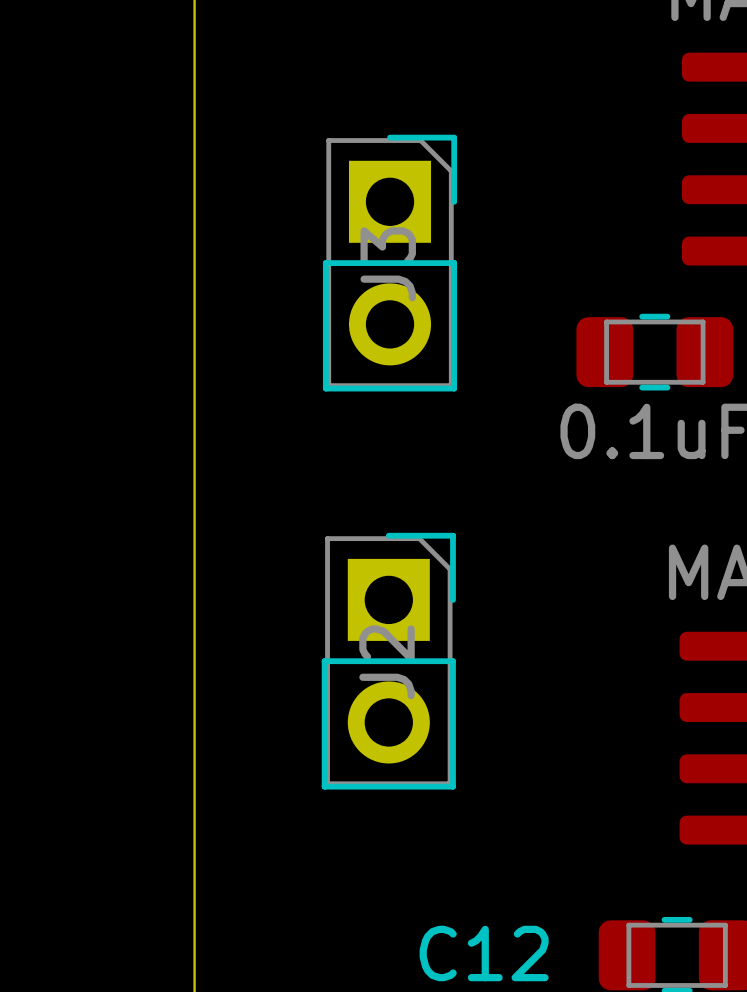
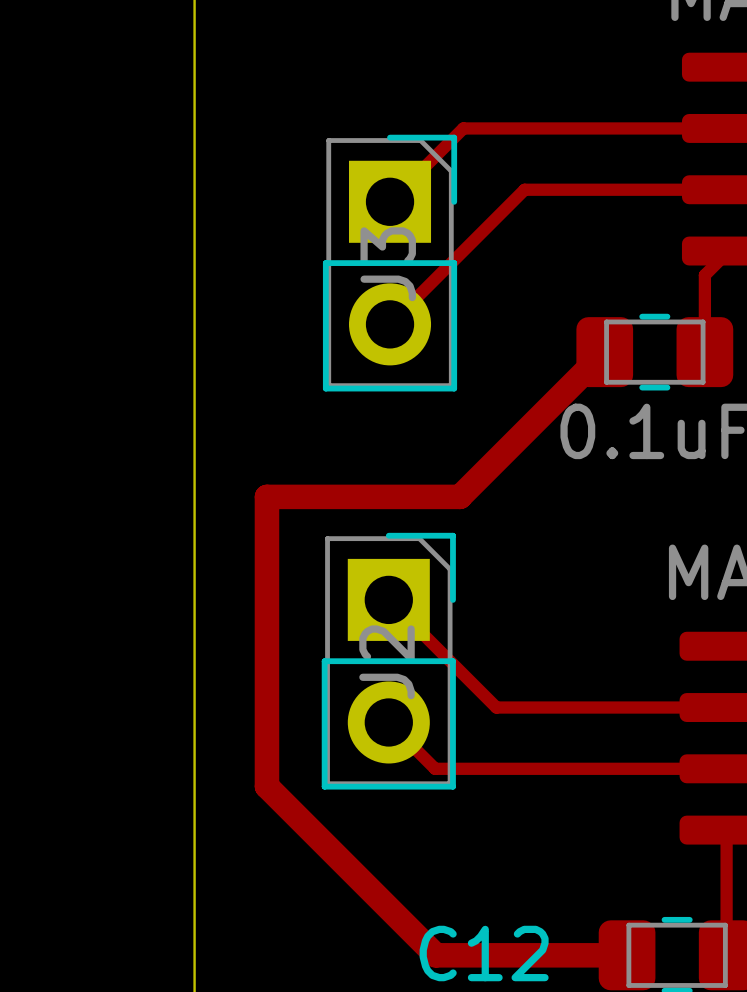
track: none -> (729, 128) (463, 128) (390, 201)
track: none -> (729, 189) (524, 189) (390, 324)
track: none -> (729, 251) (704, 275) (704, 352)
track: none -> (604, 352) (459, 496) (266, 496) (266, 786) (435, 955) (627, 955)
track: none -> (388, 599) (496, 707) (726, 707)
track: none -> (388, 722) (435, 768) (726, 768)
track: none -> (726, 830) (726, 954)

